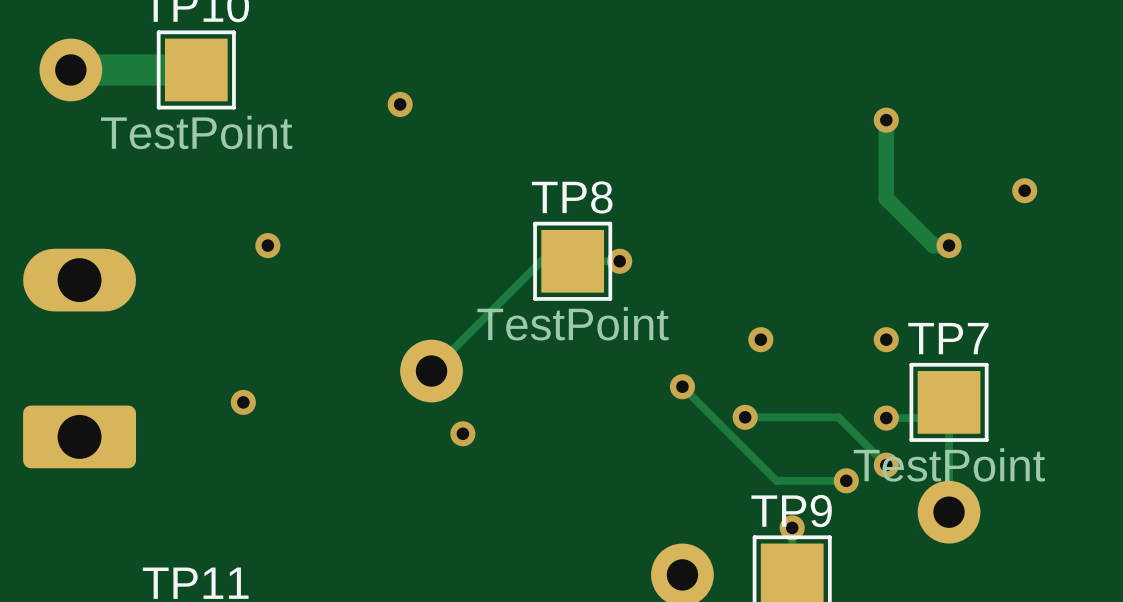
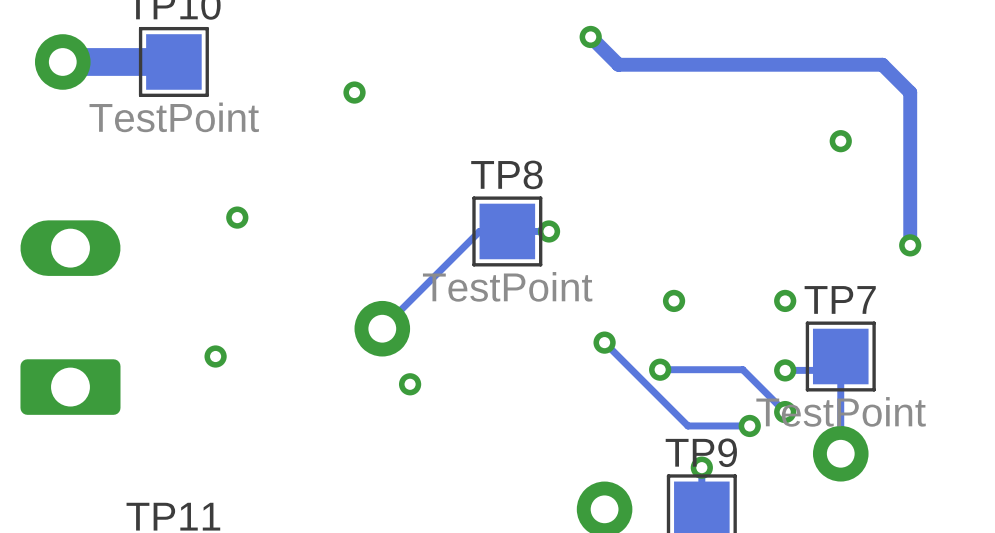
track: none -> (590, 36) (618, 64) (882, 64) (910, 92) (910, 245)
via: none -> (590, 36)
track: (886, 120) (886, 198) (933, 245) (949, 245) -> none
via: (886, 120) -> none
via: none -> (840, 141)
via: (1024, 190) -> none
via: (949, 245) -> none
via: none -> (910, 245)

